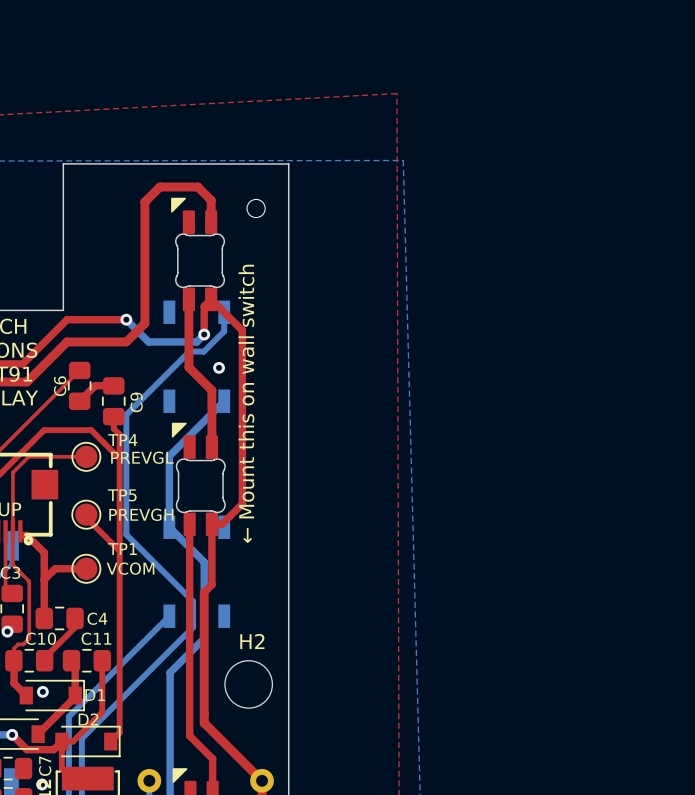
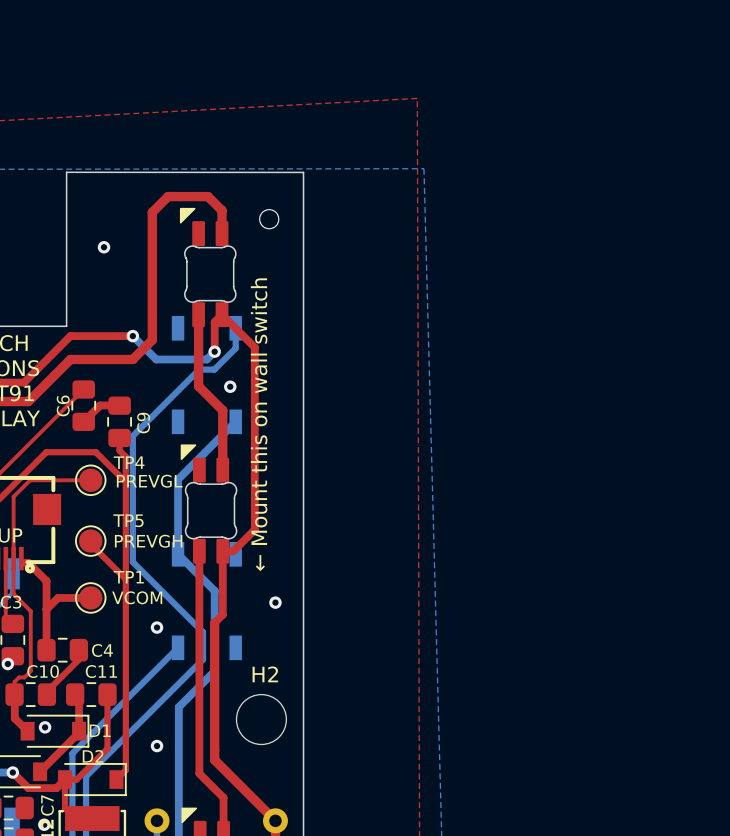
via: none -> (104, 247)
via: none -> (275, 602)
via: none -> (157, 627)
via: none -> (157, 746)

